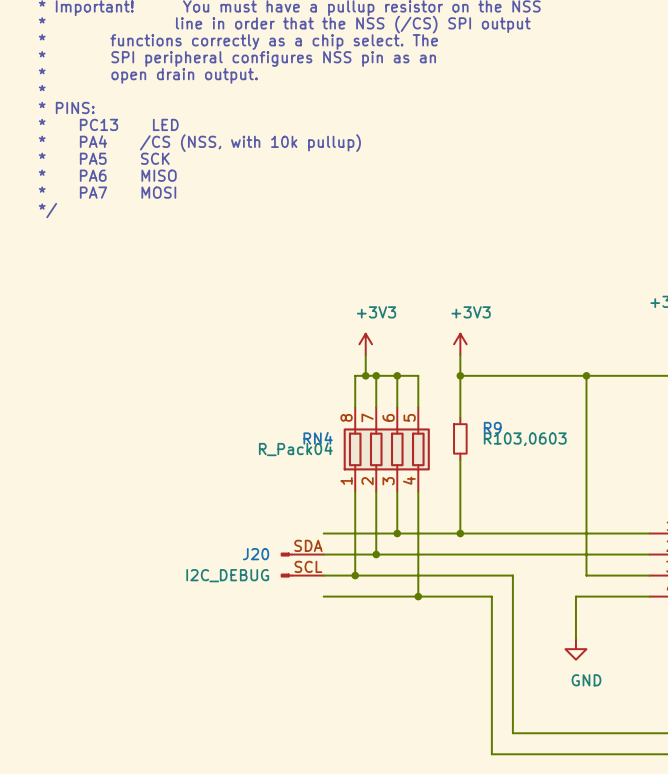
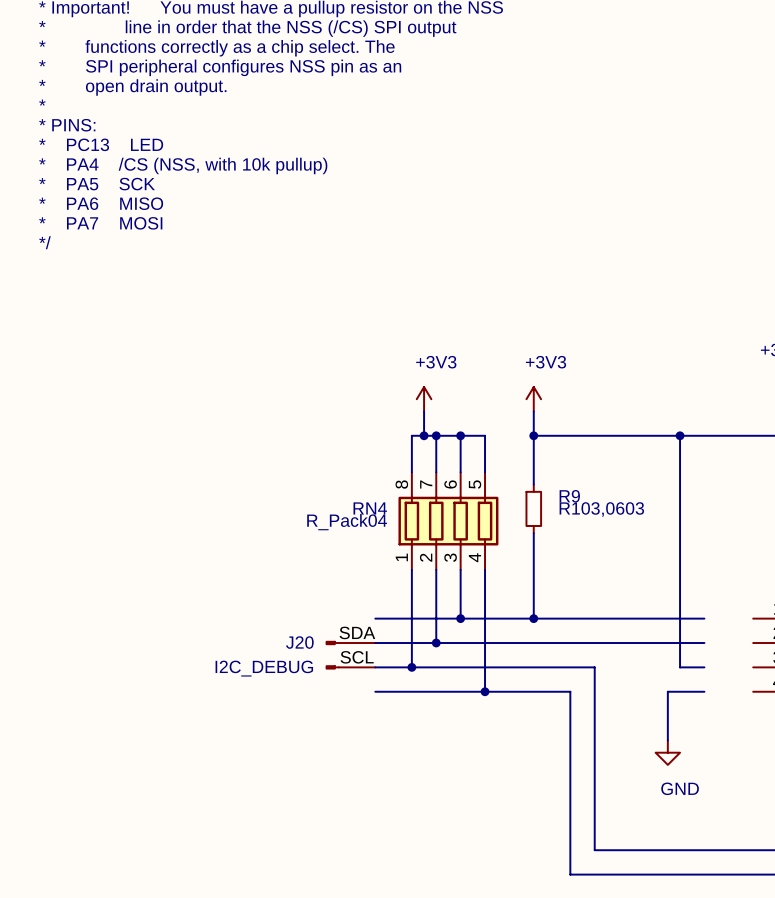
wire: (607, 533) (649, 533) -> none
wire: (607, 554) (649, 554) -> none
wire: (607, 575) (649, 575) -> none
wire: (607, 596) (649, 596) -> none

